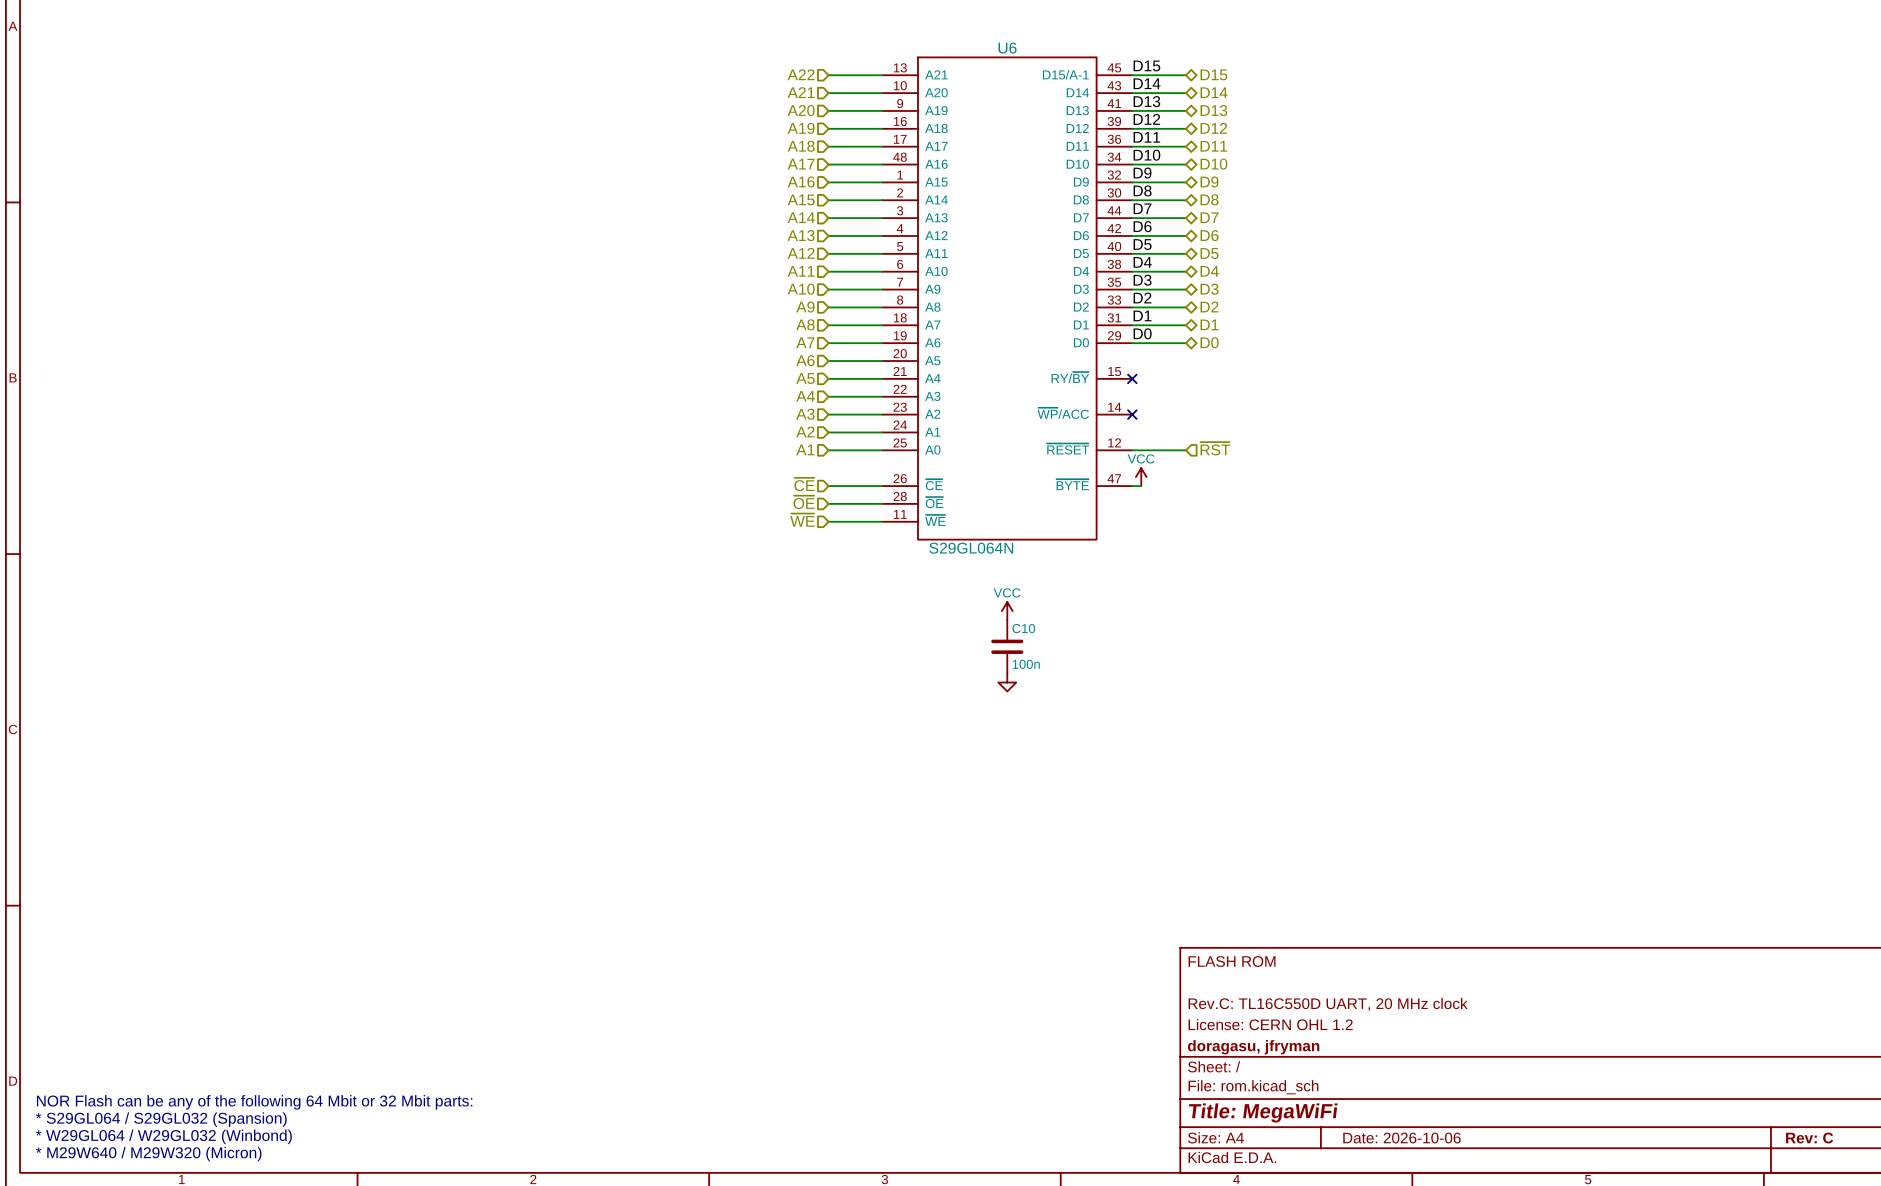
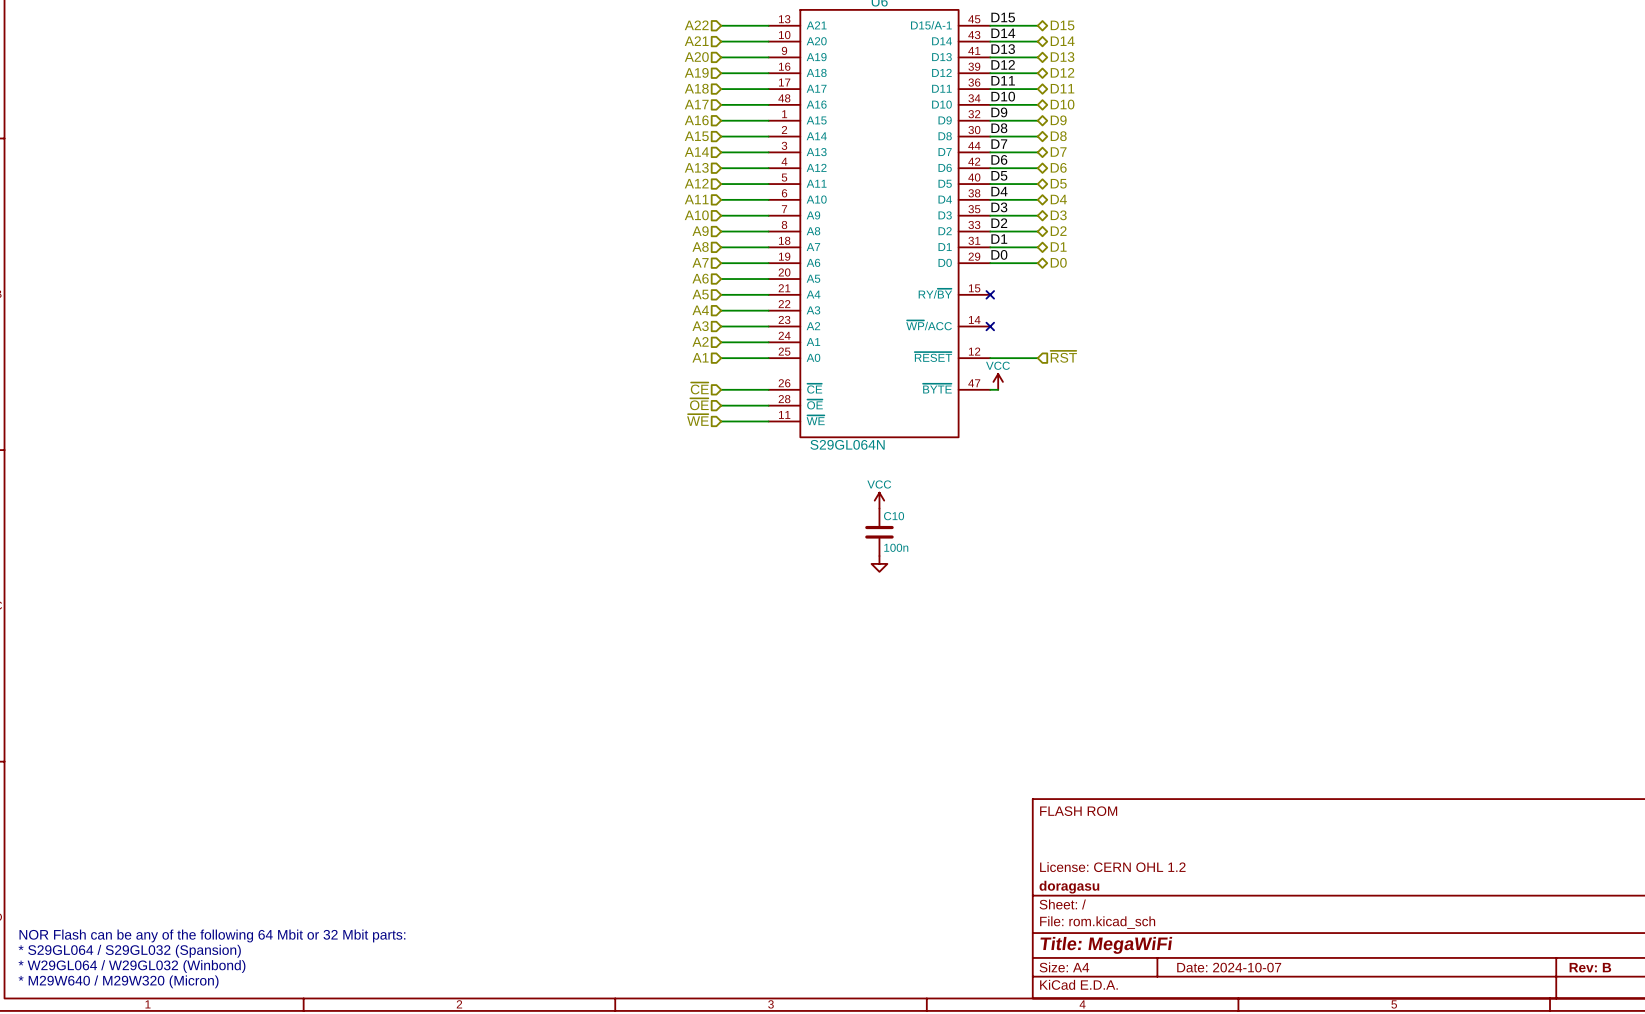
title block: Rev.C: TL16C550D UART, 20 MHz clock (1328, 1004) -> none
title block: doragasu, jfryman (1253, 1047) -> doragasu (1069, 887)
title block: Date: 2026-10-06 (1401, 1138) -> Date: 2024-10-07 (1229, 967)
title block: Rev: C (1809, 1138) -> Rev: B (1590, 967)

